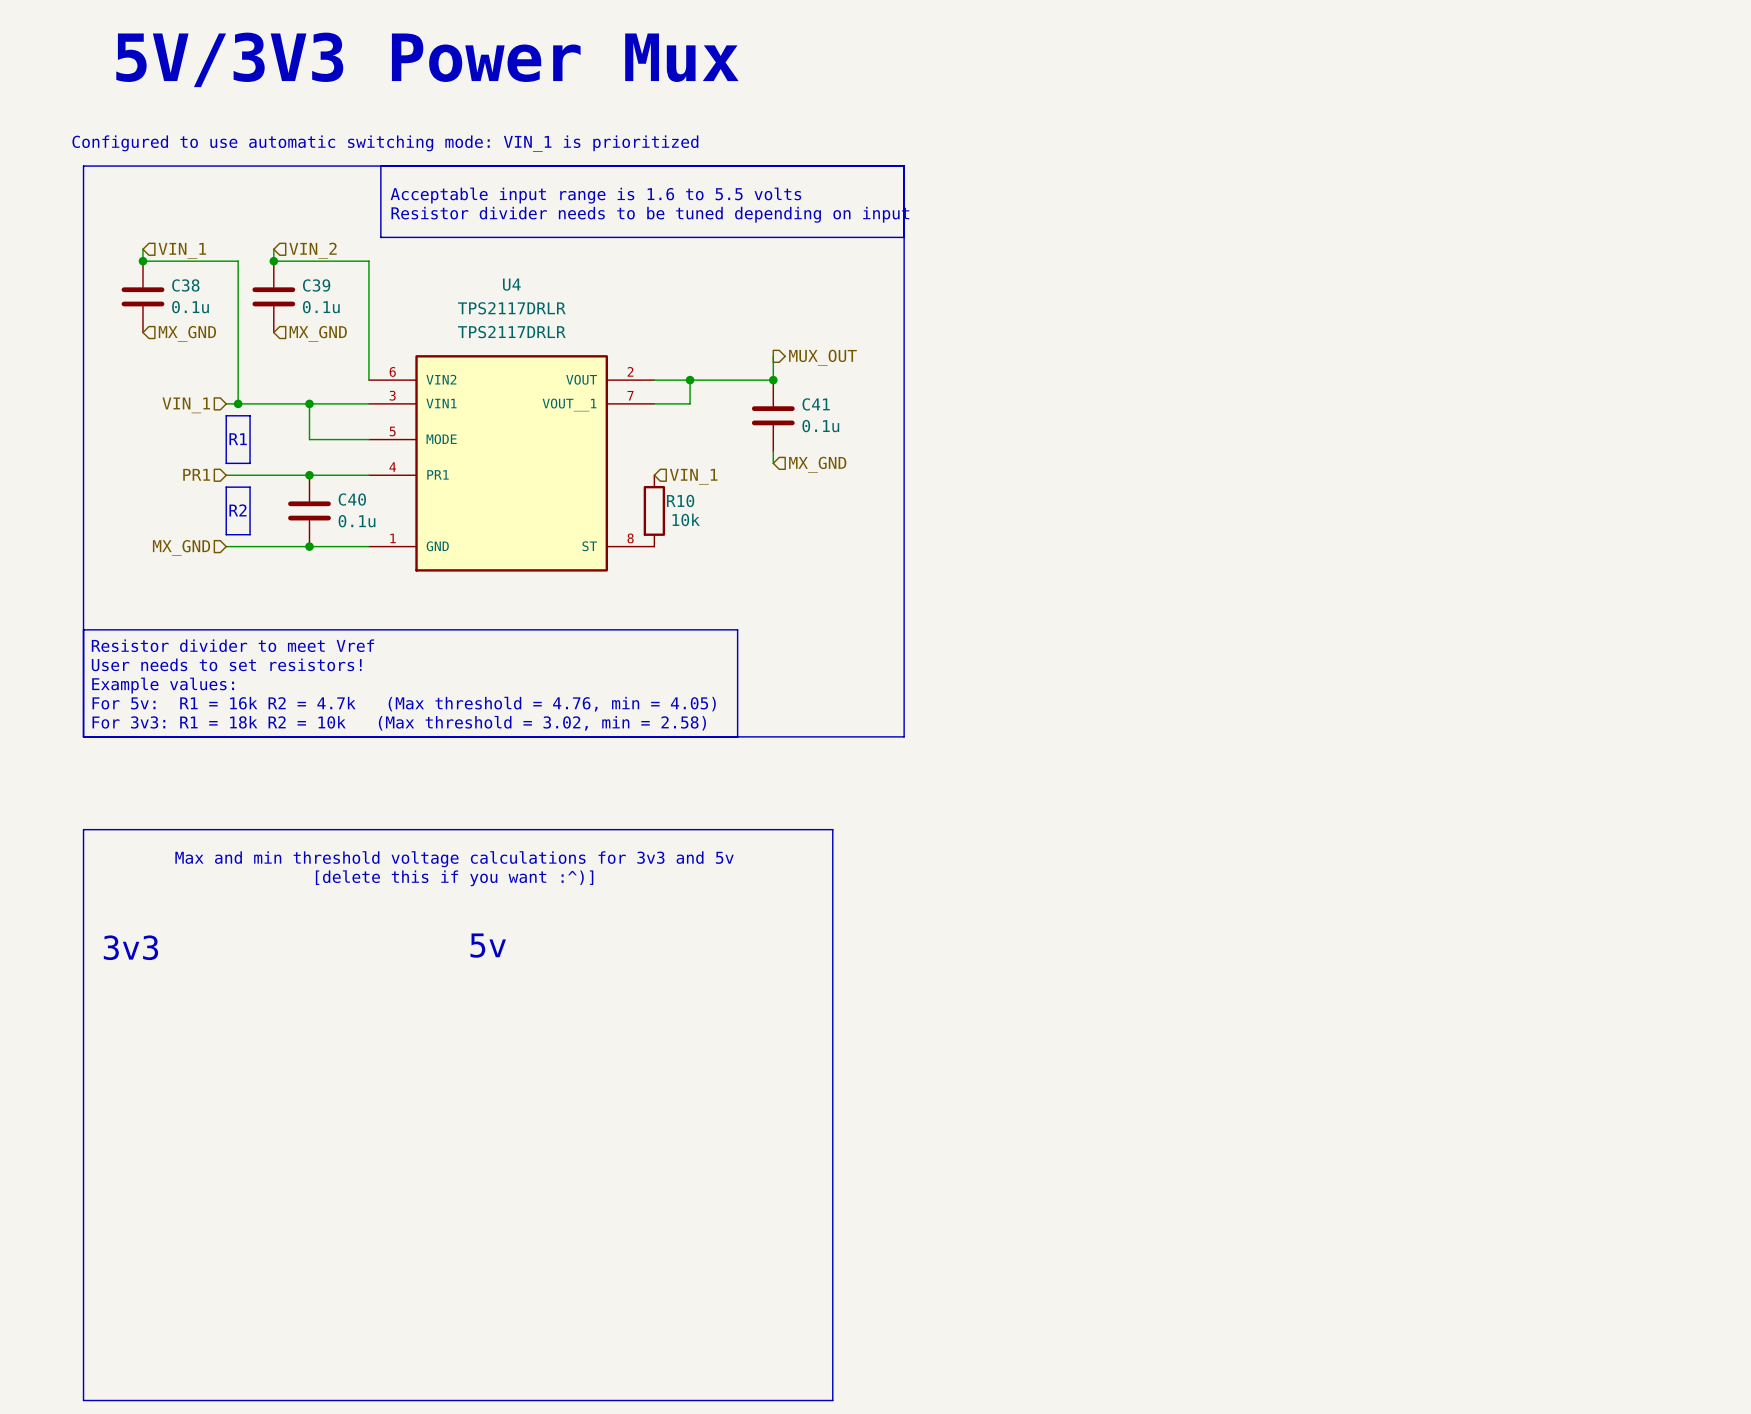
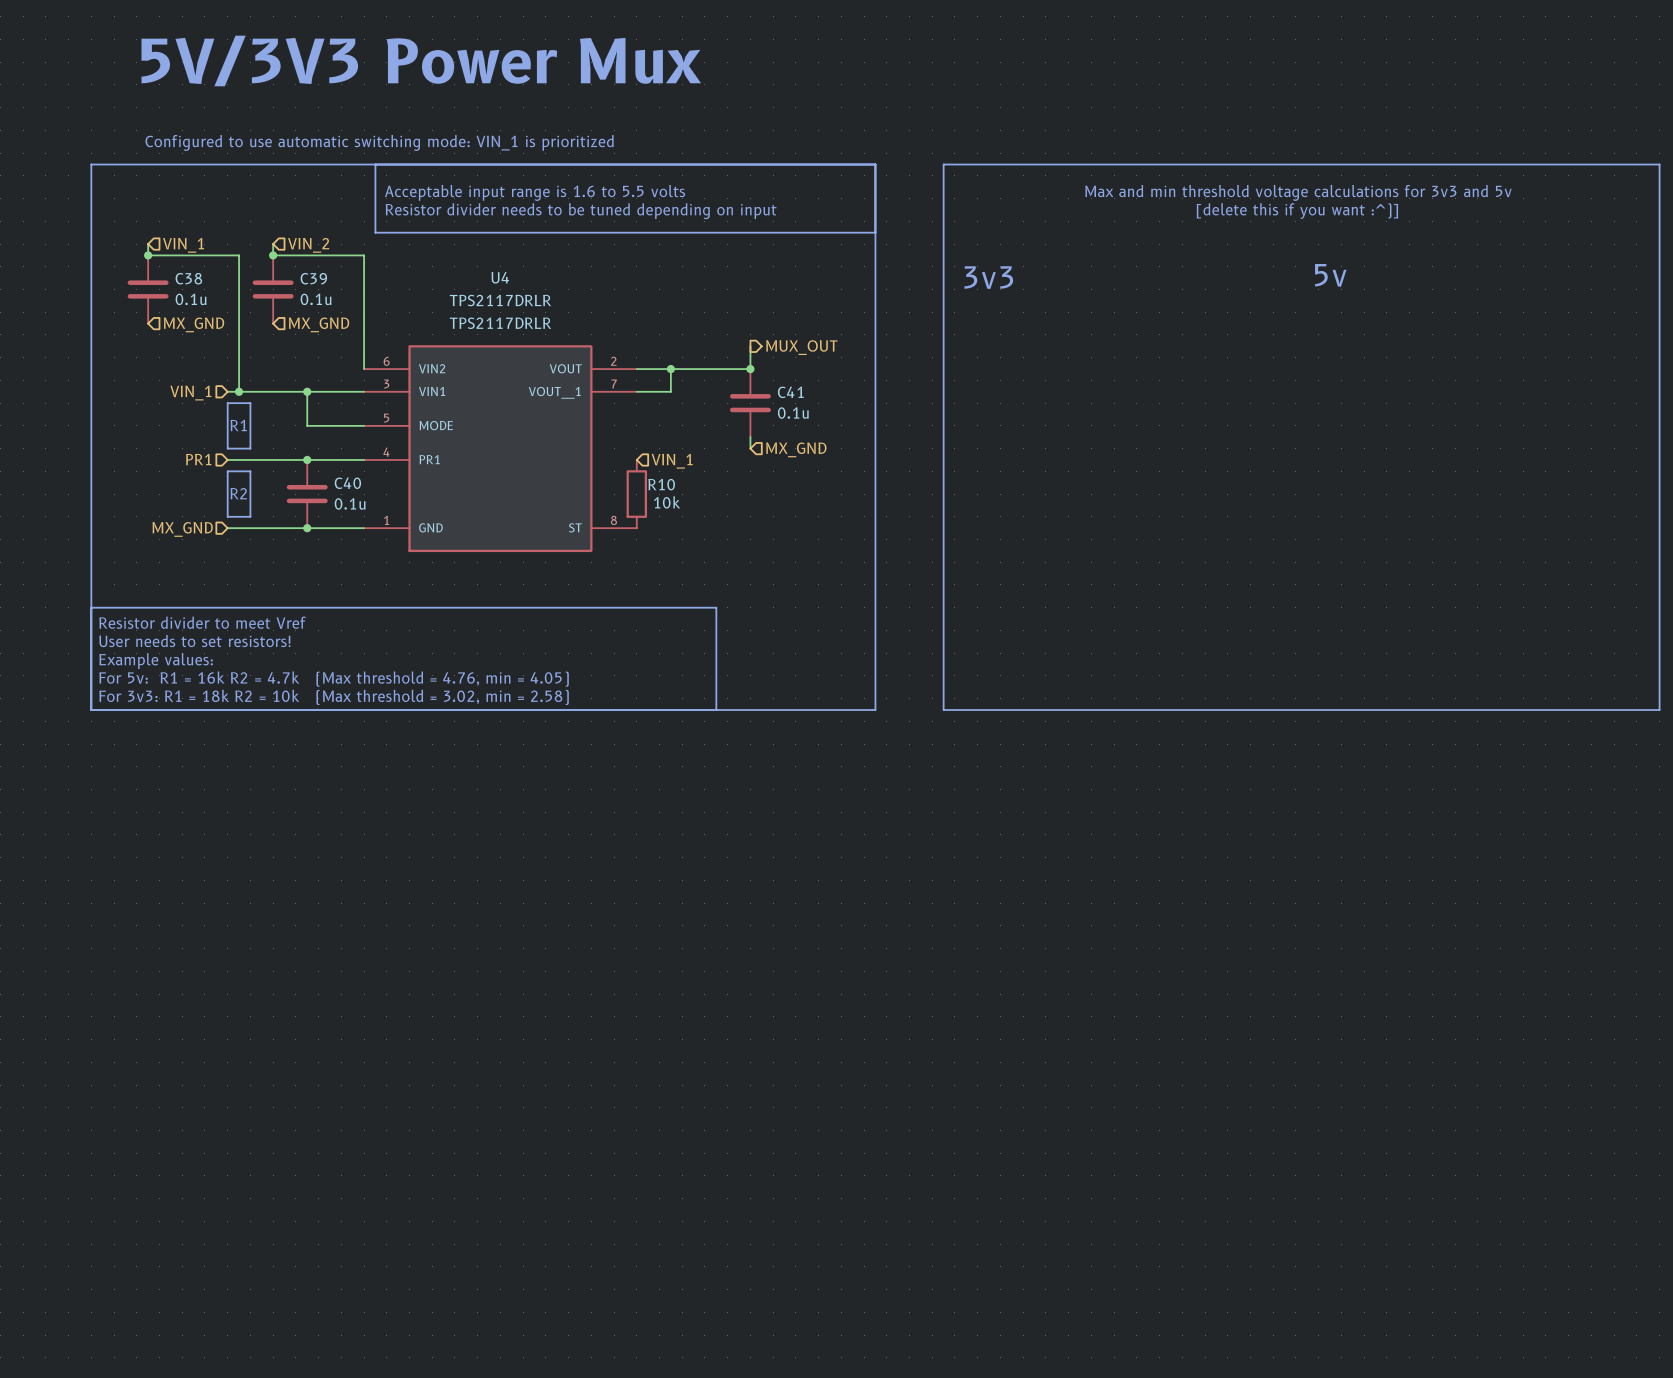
line: none -> (943, 164) (1659, 164) (1659, 709) (943, 709) (943, 164)
text: none -> Max and min threshold voltage calculations for 3v3 and 5v (1298, 192)
text: none -> [delete this if you want :^)] (1297, 211)
text: none -> 5v (1330, 275)
text: none -> 3v3 (988, 277)
line: (83, 829) (83, 1400) (832, 1400) (832, 829) (83, 829) -> none
text: Max and min threshold voltage calculations for 3v3 and 5v (454, 859) -> none
text: [delete this if you want :^)] (454, 878) -> none
text: 5v (488, 945) -> none
text: 3v3 (130, 947) -> none

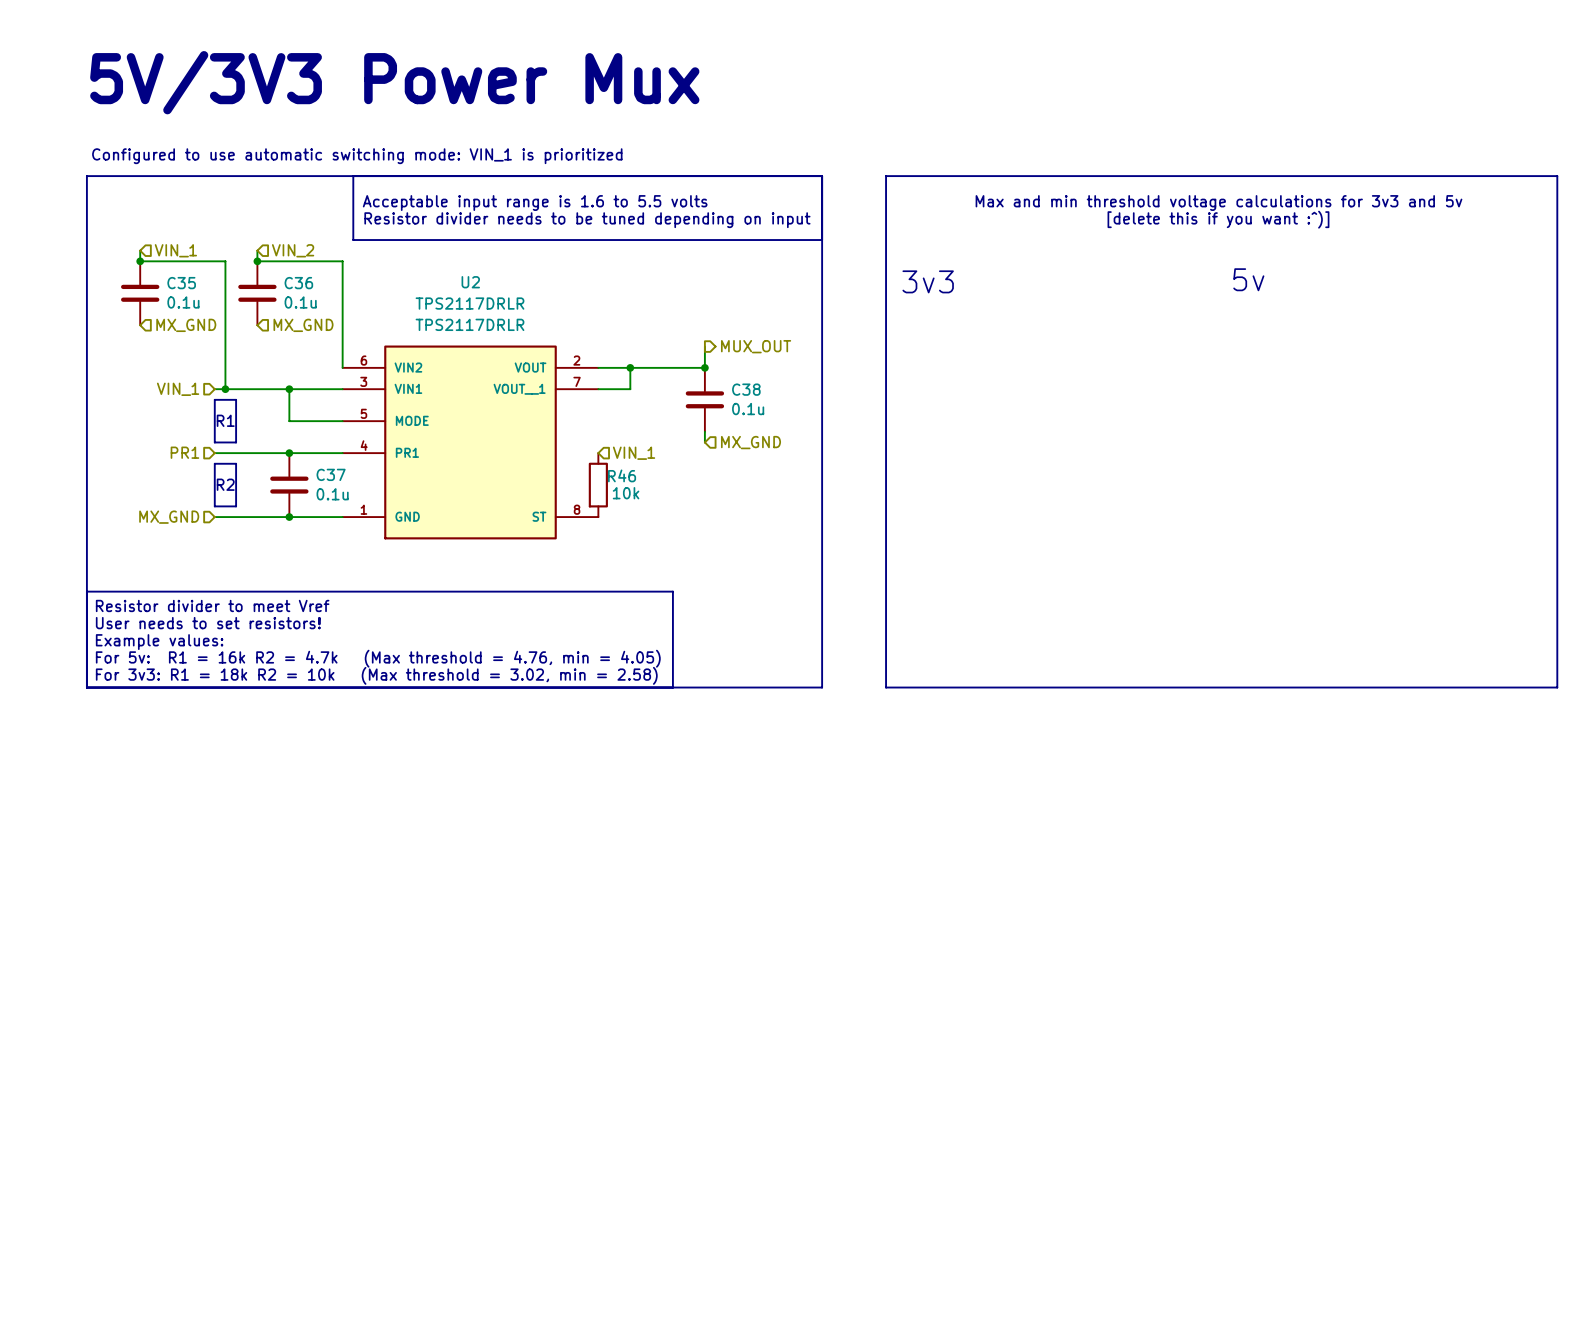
U4 name: U4 (500, 277) -> U2 (470, 282)
C38 name: C38 (188, 278) -> C35 (181, 283)
C39 name: C39 (313, 278) -> C36 (298, 283)
C41 name: C41 (790, 392) -> C38 (746, 389)
C40 name: C40 (347, 483) -> C37 (331, 474)
R10 name: R10 (661, 484) -> R46 (622, 475)

